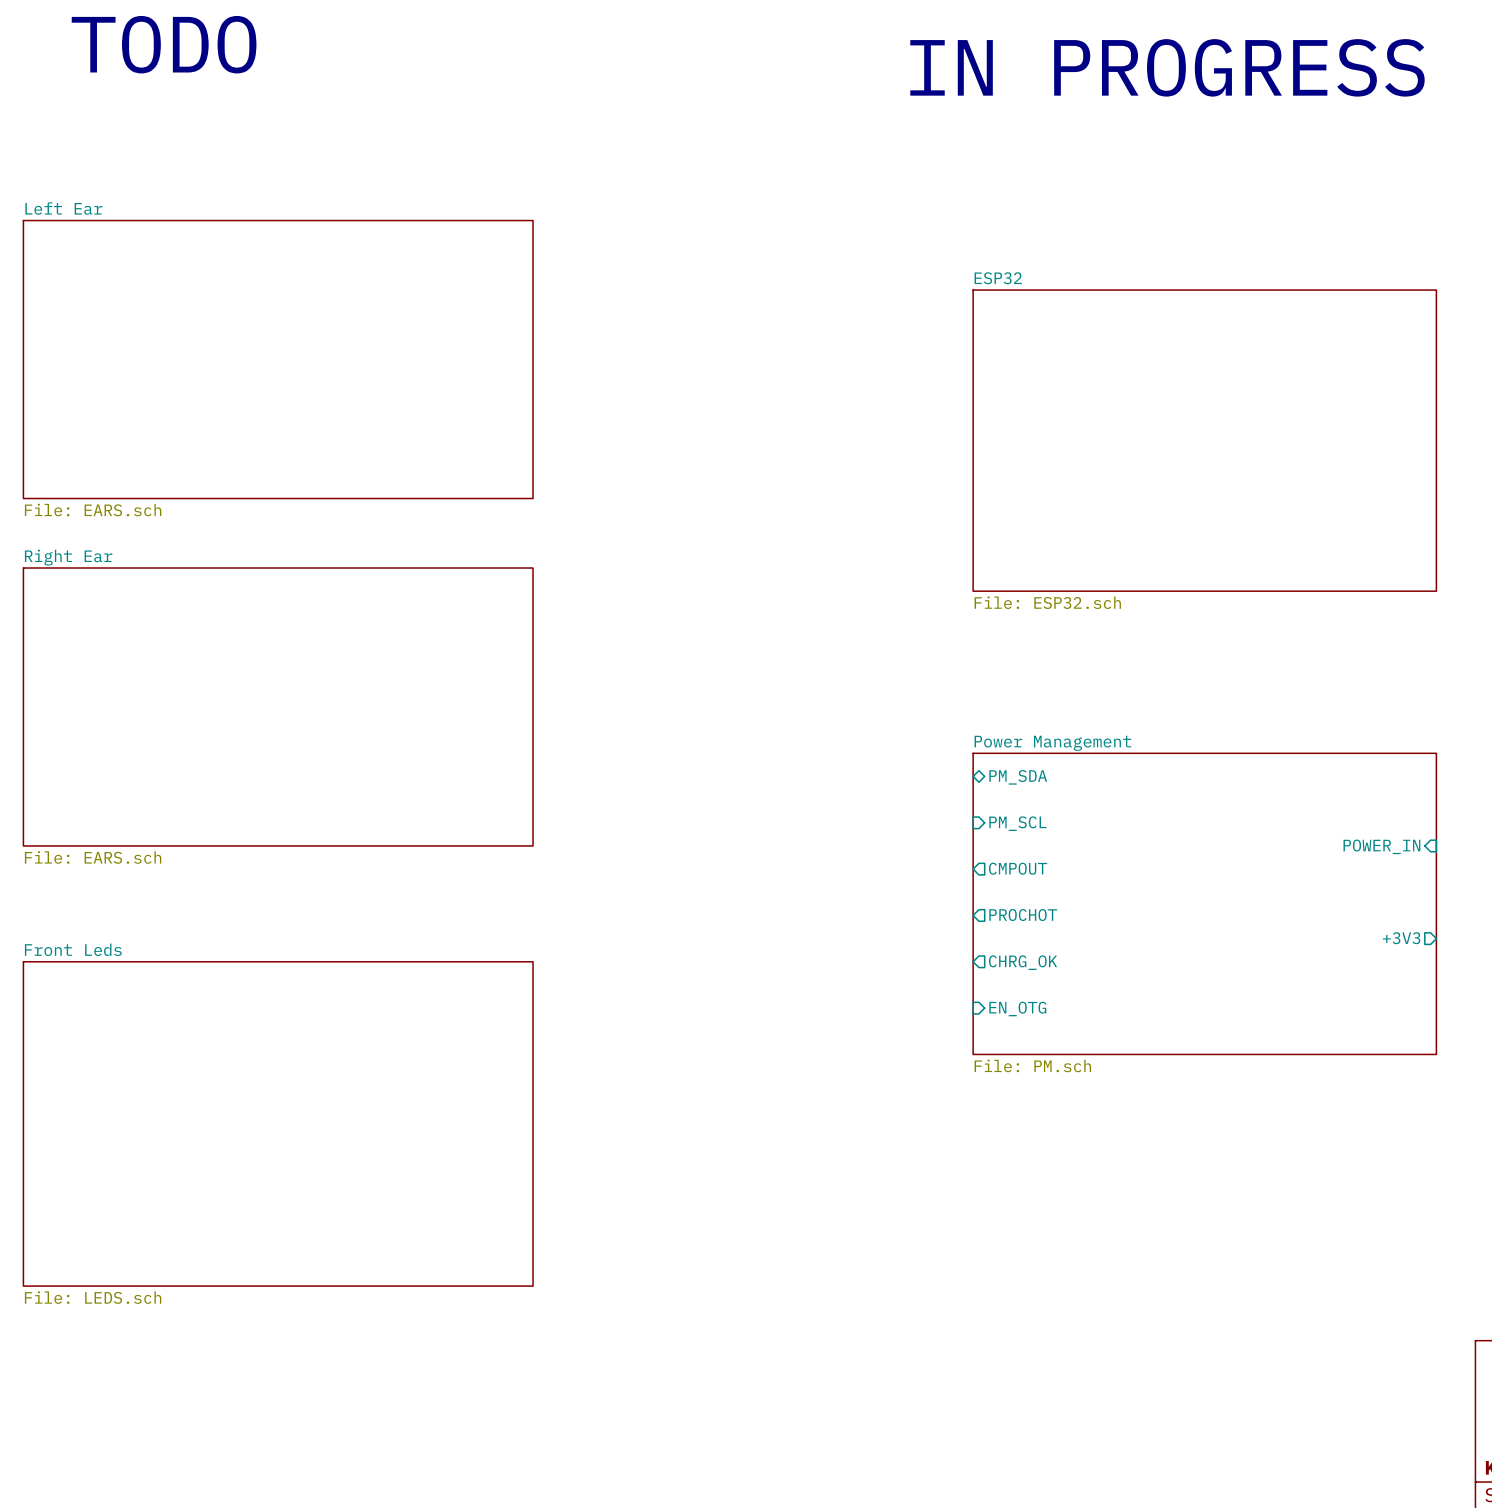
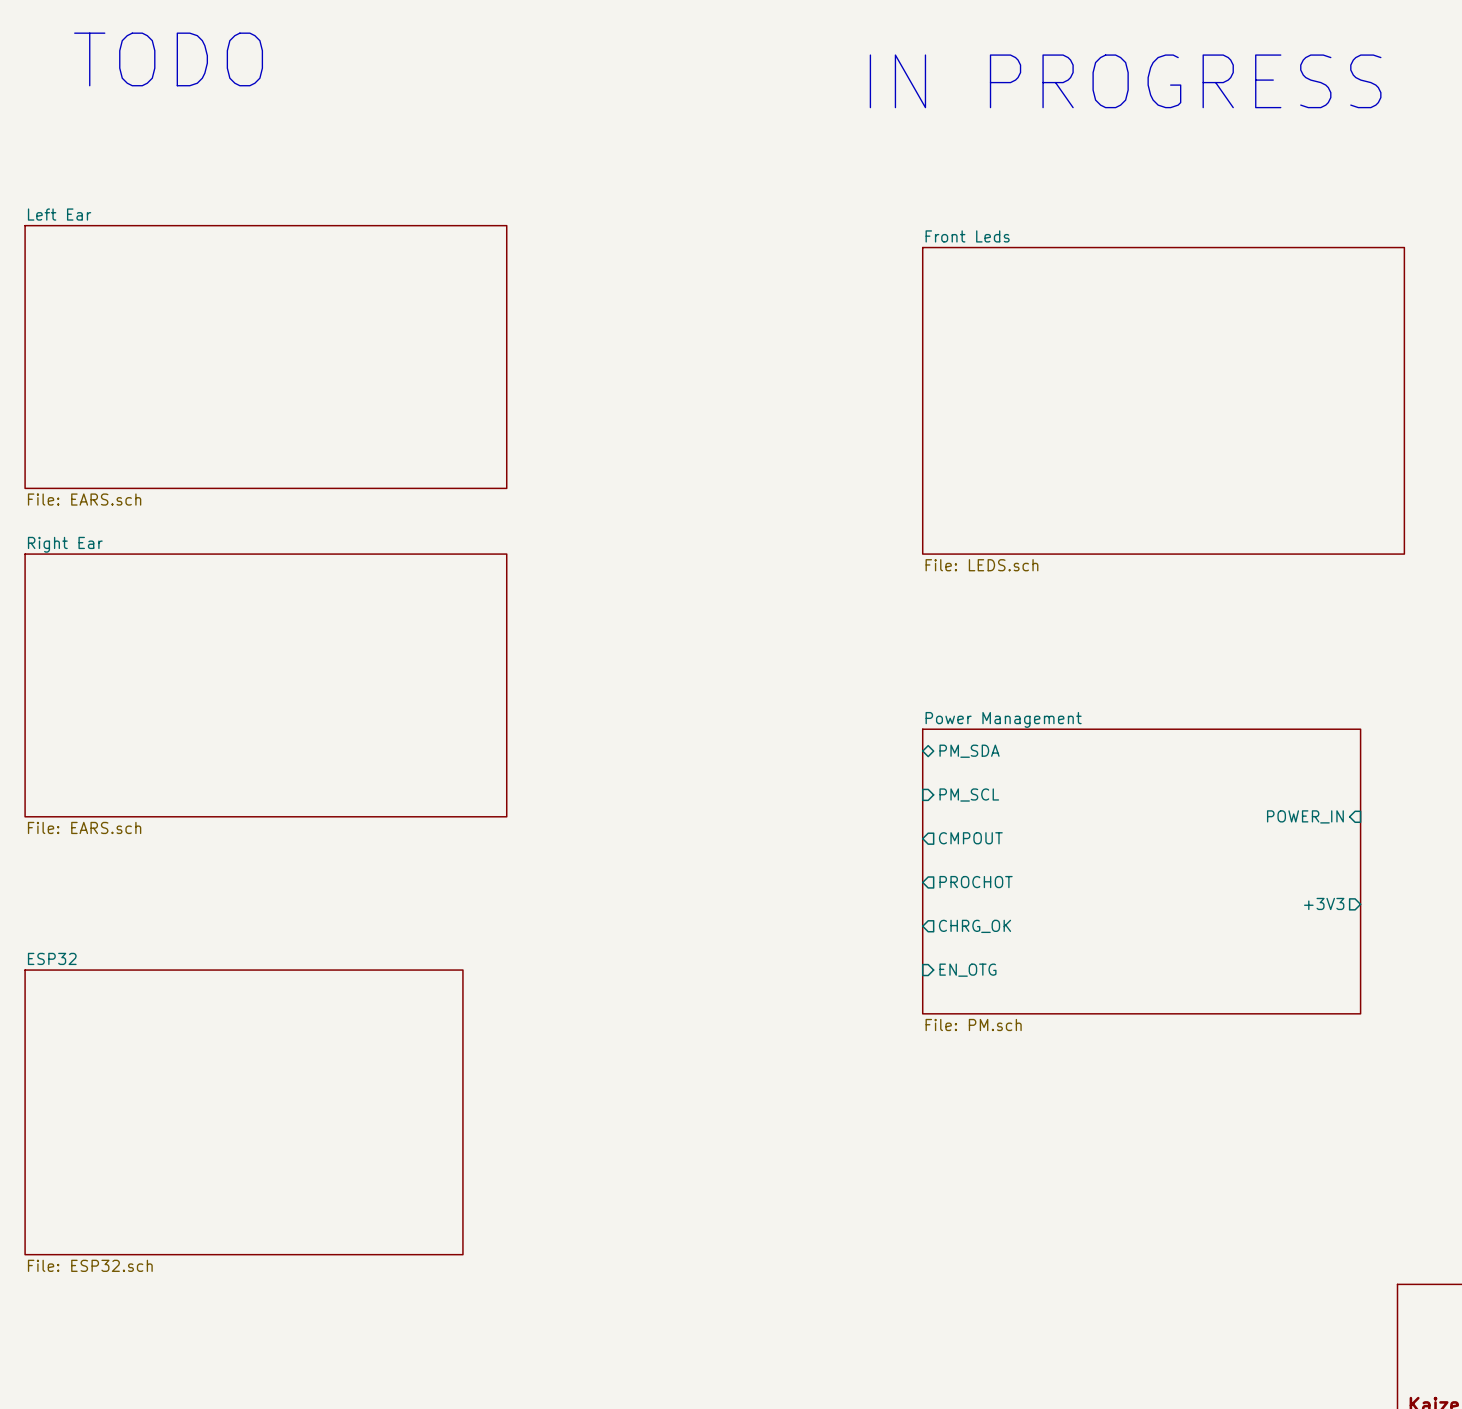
sheet Front Leds: none -> File: LEDS.sch (1163, 400)
sheet ESP32 position: (1204, 440) -> (244, 1112)
sheet Front Leds: File: LEDS.sch (278, 1123) -> none

